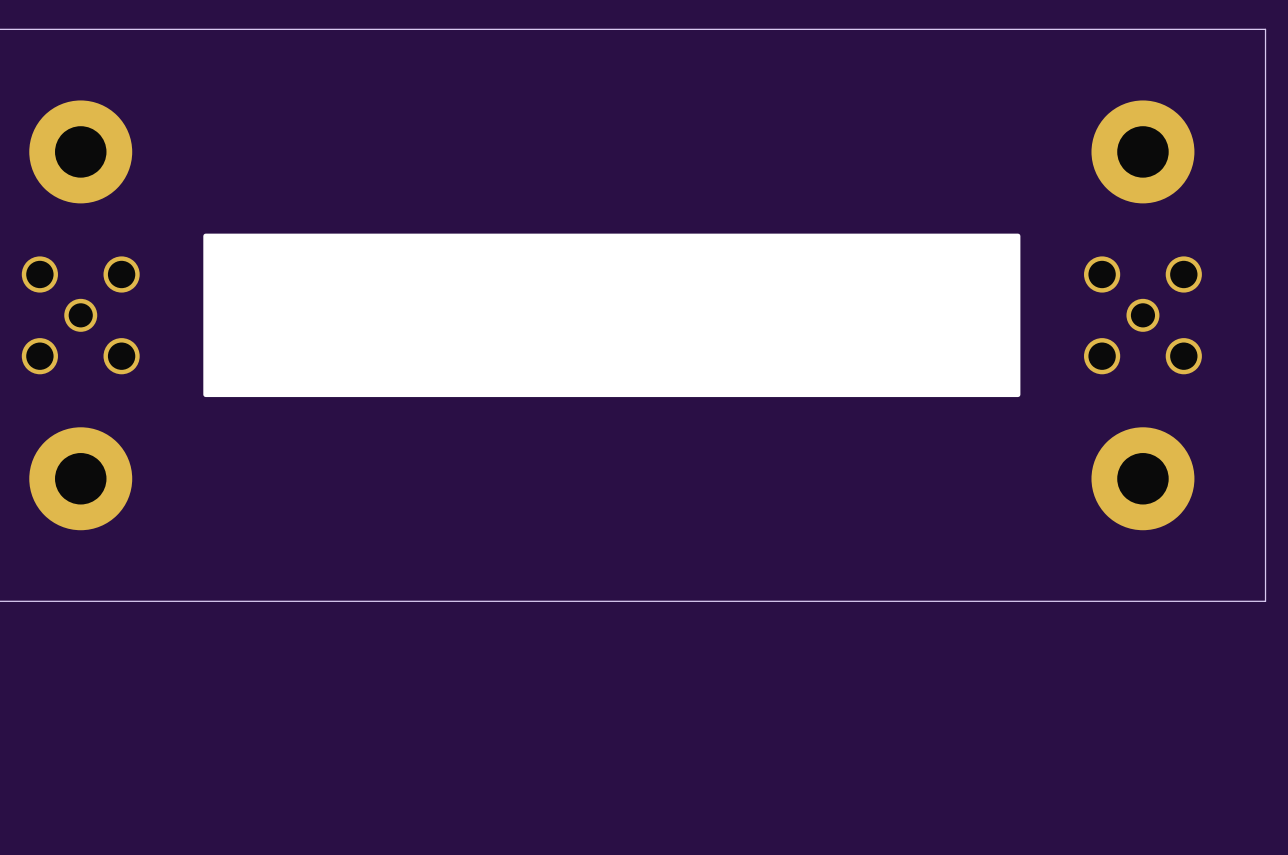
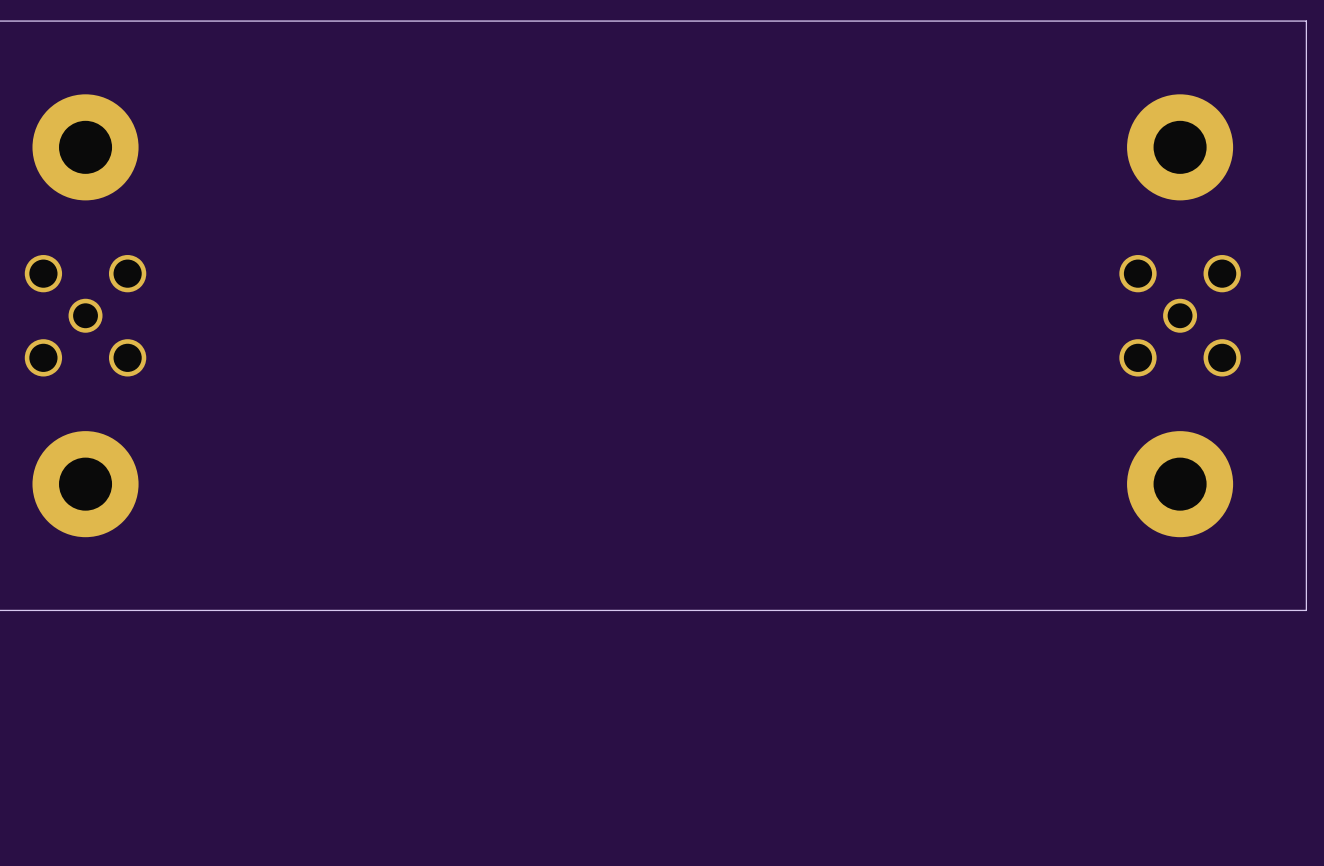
drawing: [203, 233, 1021, 398] -> none

